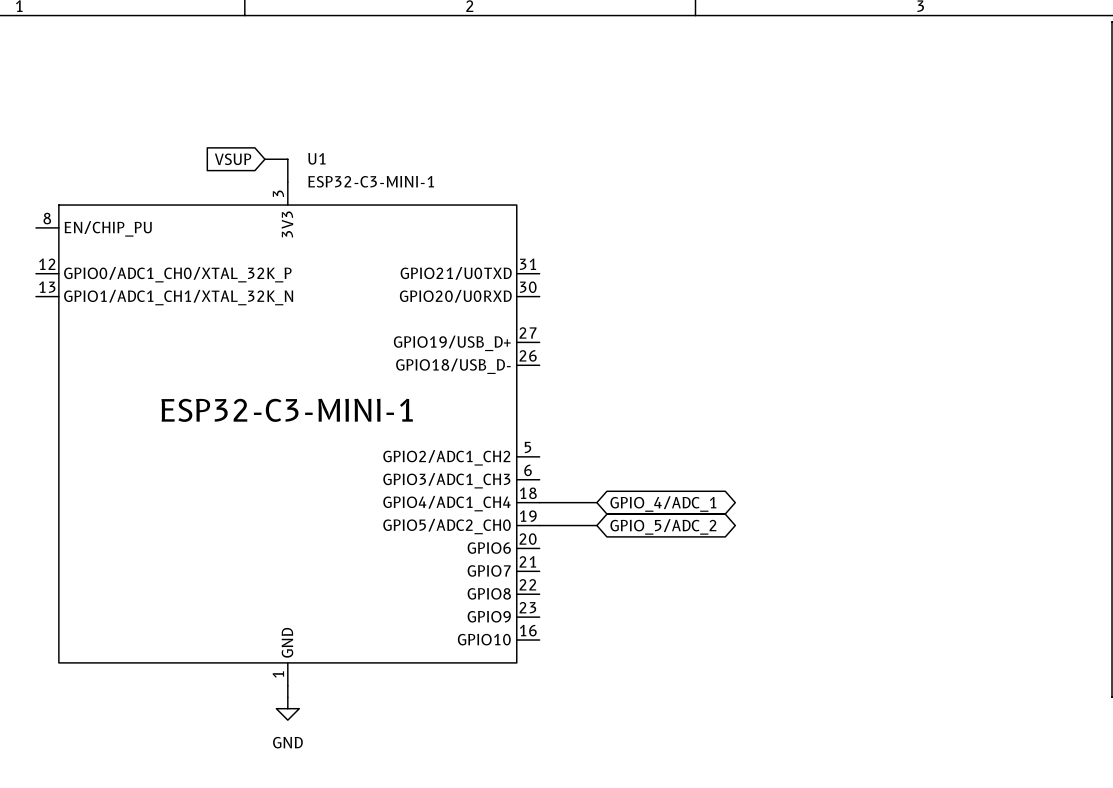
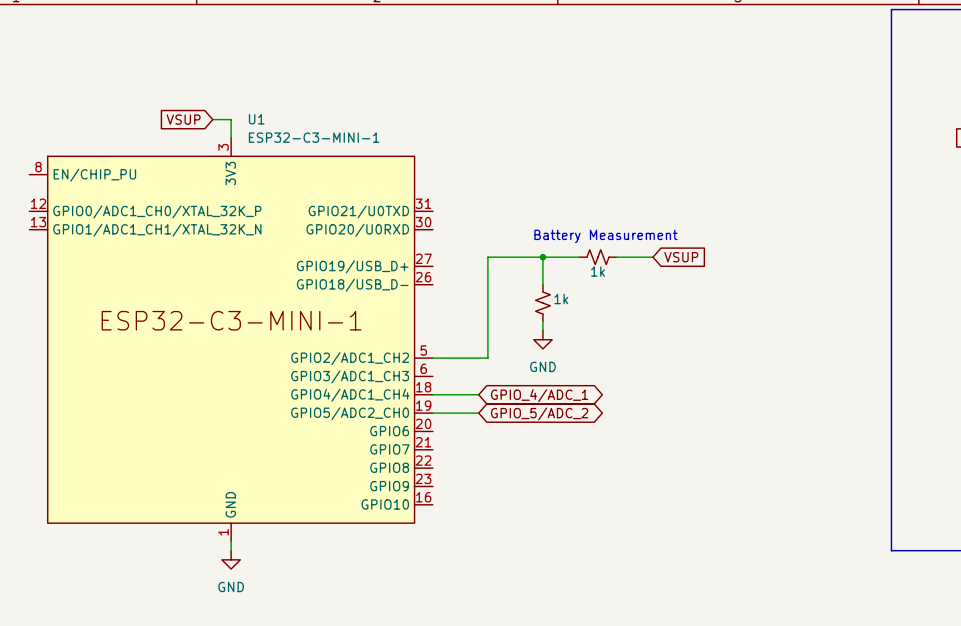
text: none -> Battery Measurement (605, 236)
wire: none -> (542, 257) (542, 284)
junction: none -> (542, 257)
wire: none -> (579, 257) (487, 257) (487, 358) (432, 358)
part: none -> 1k (597, 257)
wire: none -> (616, 257) (653, 257)
global label: none -> VSUP (681, 257)
part: none -> 1k (542, 303)
wire: none -> (542, 321) (542, 330)
power symbol: none -> GND (542, 339)

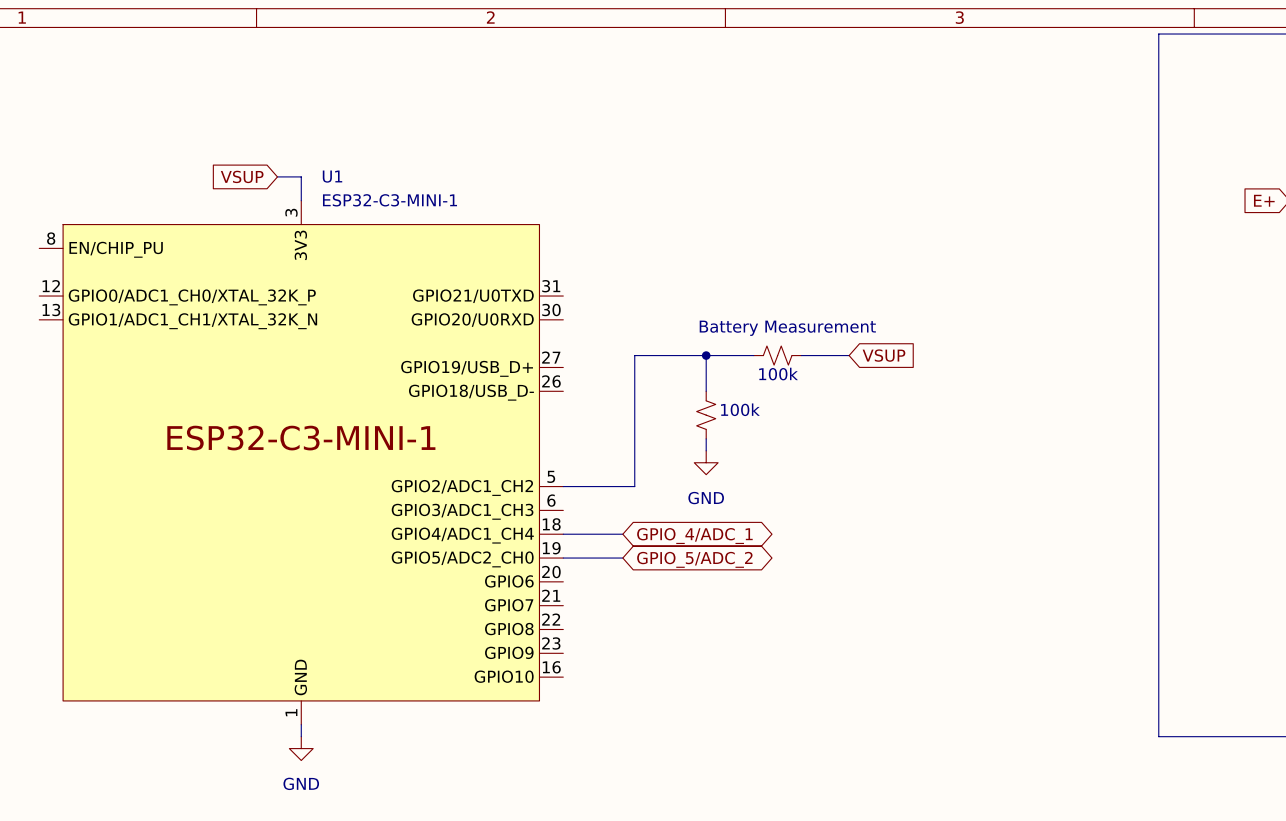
part value: 1k (597, 271) -> 100k (778, 374)
part value: 1k (561, 299) -> 100k (740, 409)

